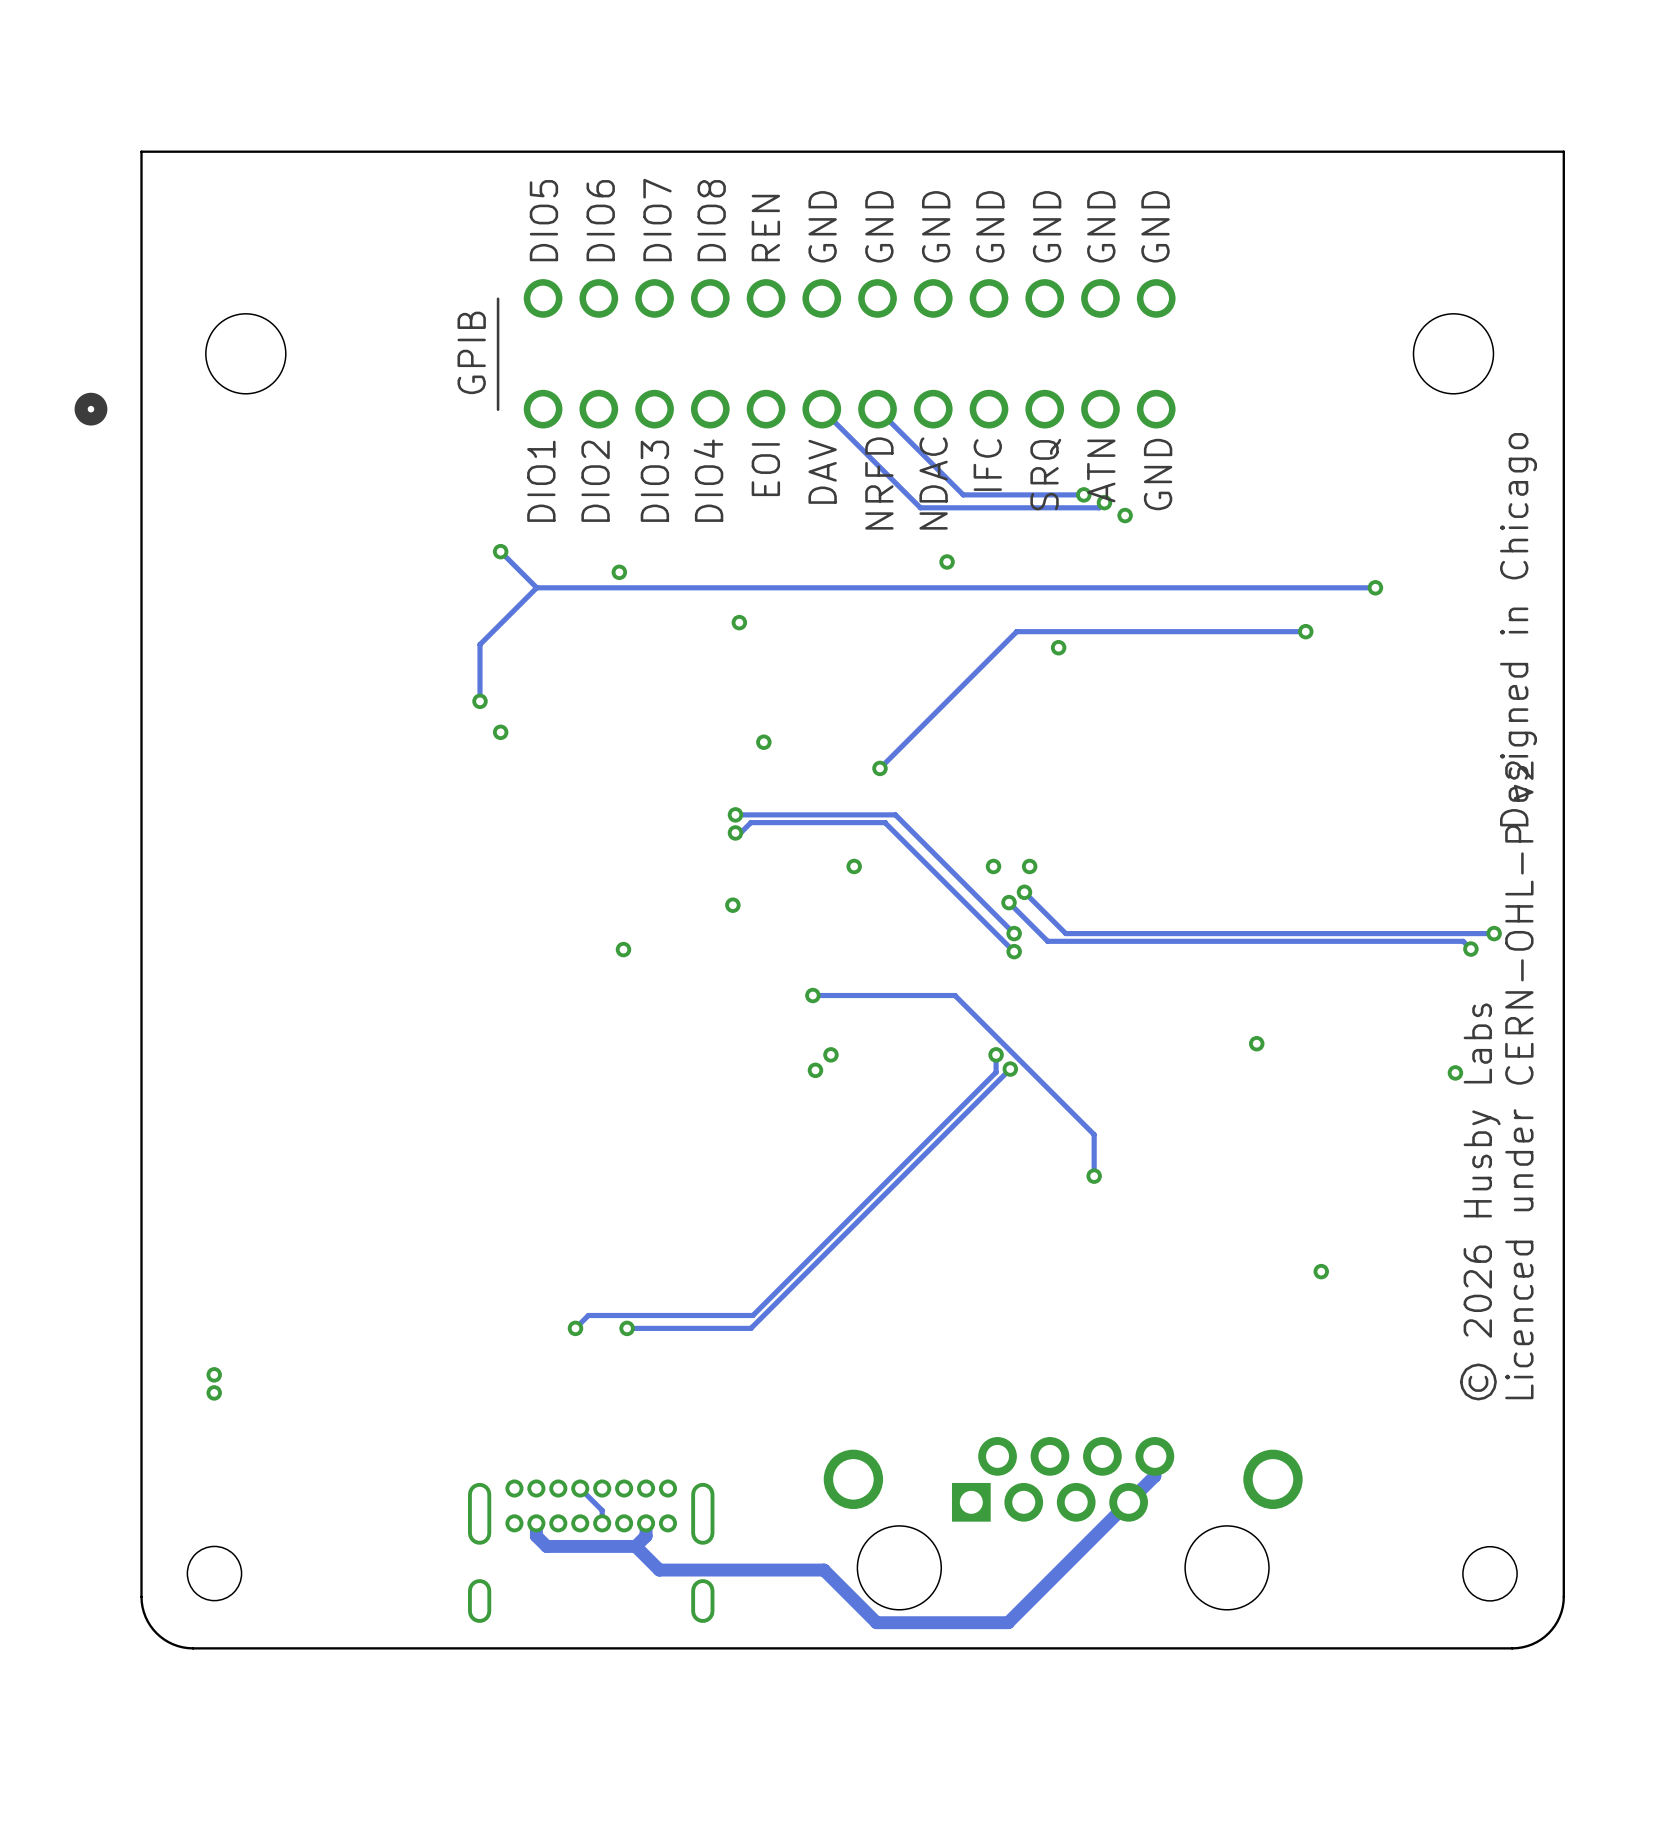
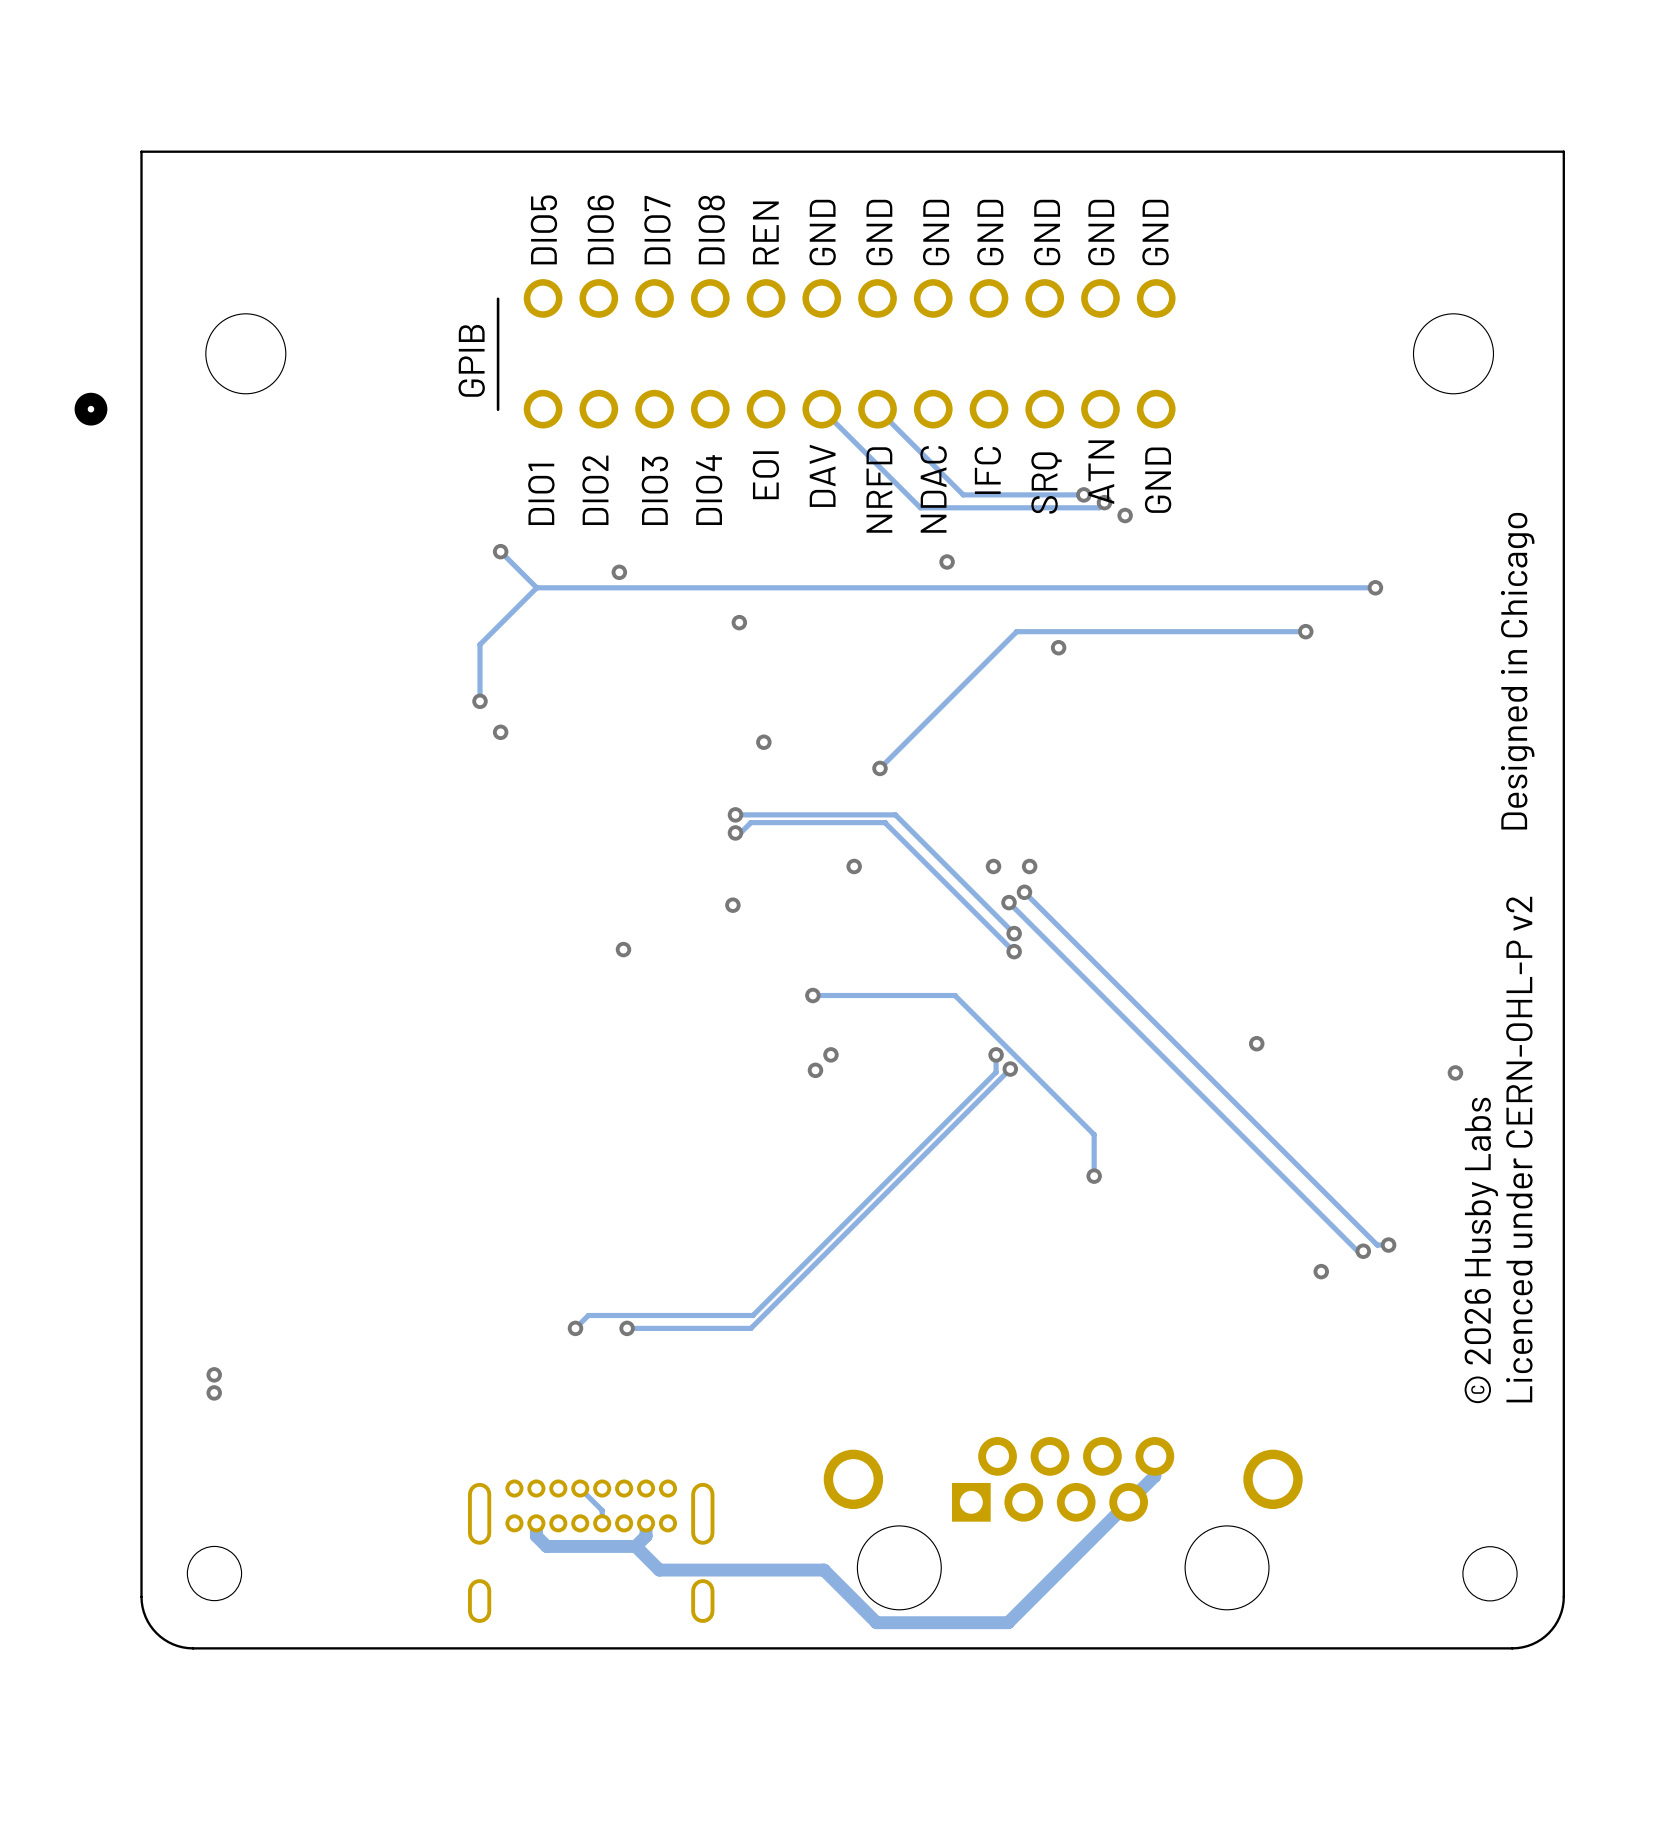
track: (1494, 933) (1065, 933) -> (1388, 1245) (1377, 1245) (1065, 933)
via: (1494, 933) -> none
track: (1047, 941) (1463, 941) (1470, 949) -> (1047, 941) (1357, 1251) (1363, 1251)
via: (1470, 949) -> none
via: none -> (1388, 1245)
via: none -> (1363, 1251)

